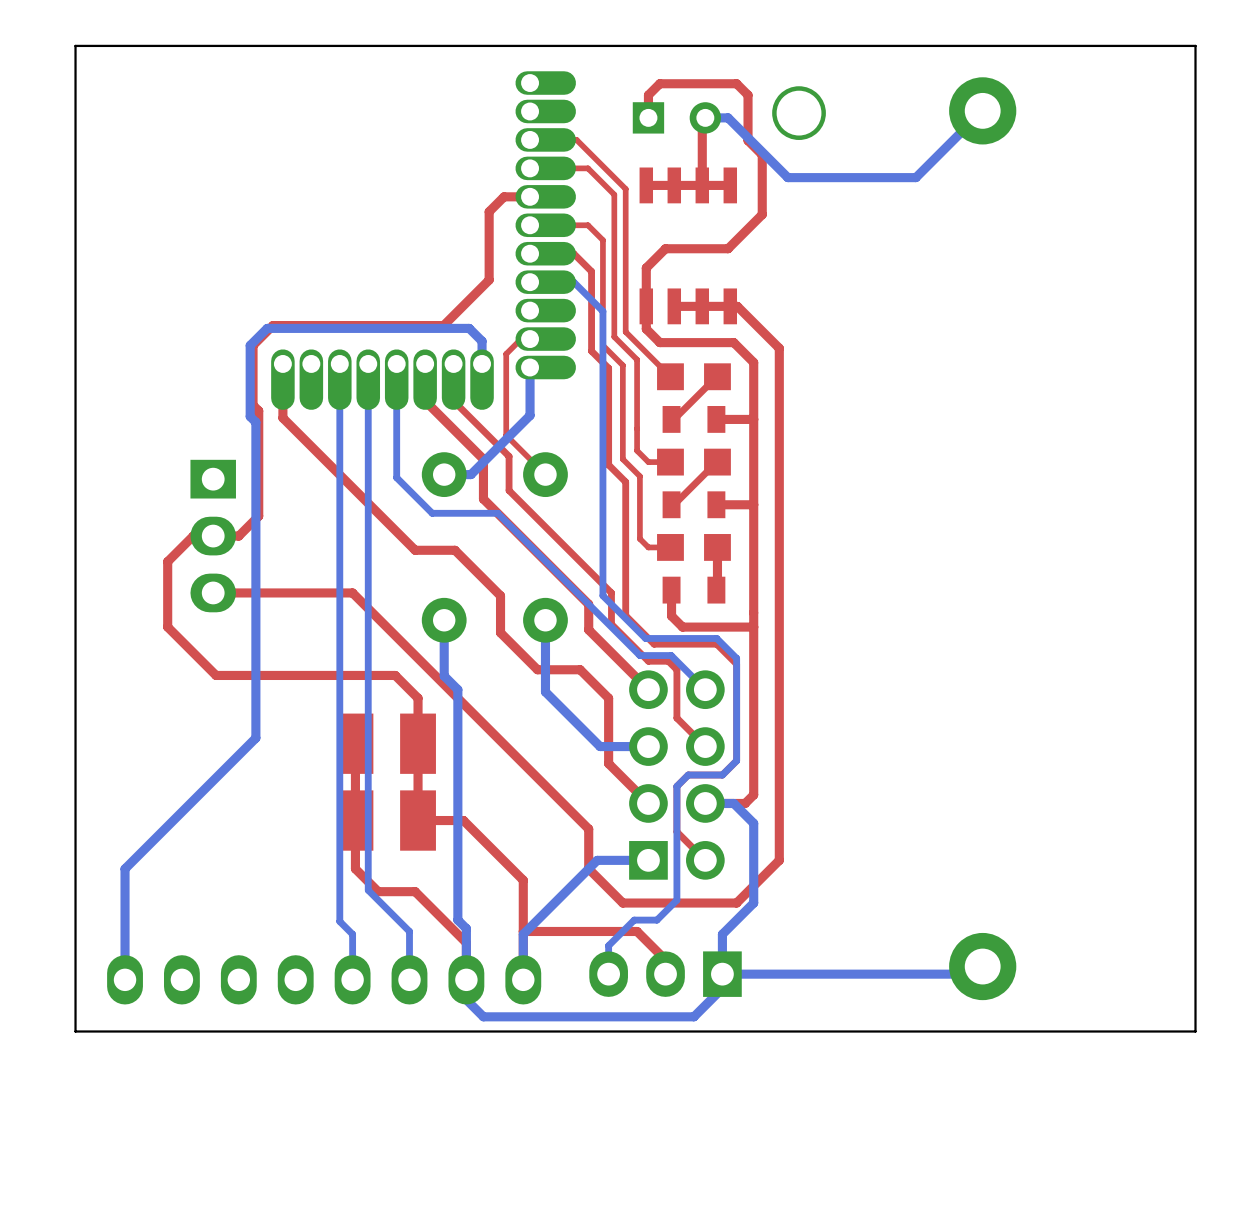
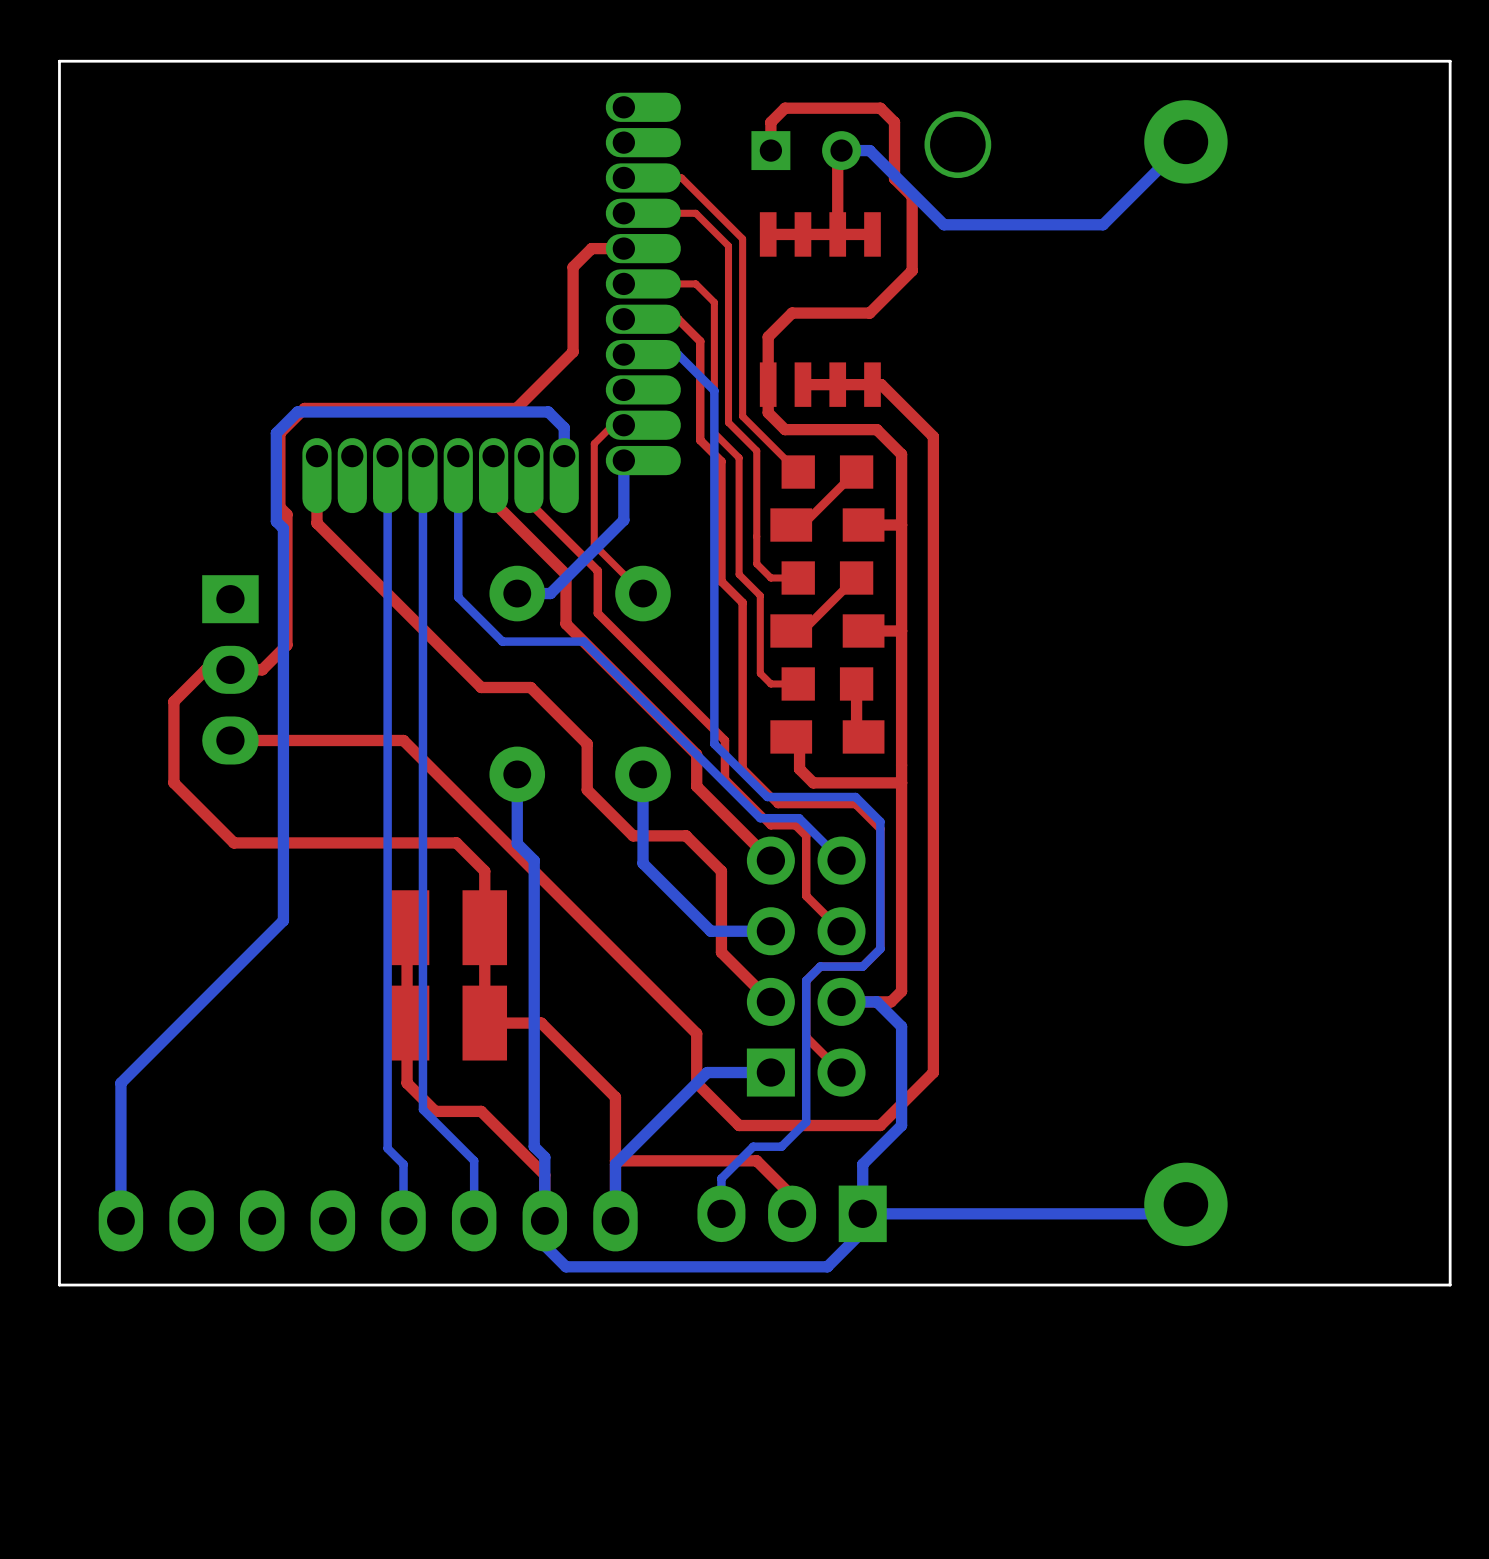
part footprint: [662, 406, 726, 433] -> [770, 508, 885, 542]
part footprint: [662, 491, 726, 519] -> [770, 614, 885, 648]
part footprint: [662, 576, 726, 604] -> [770, 720, 885, 754]

